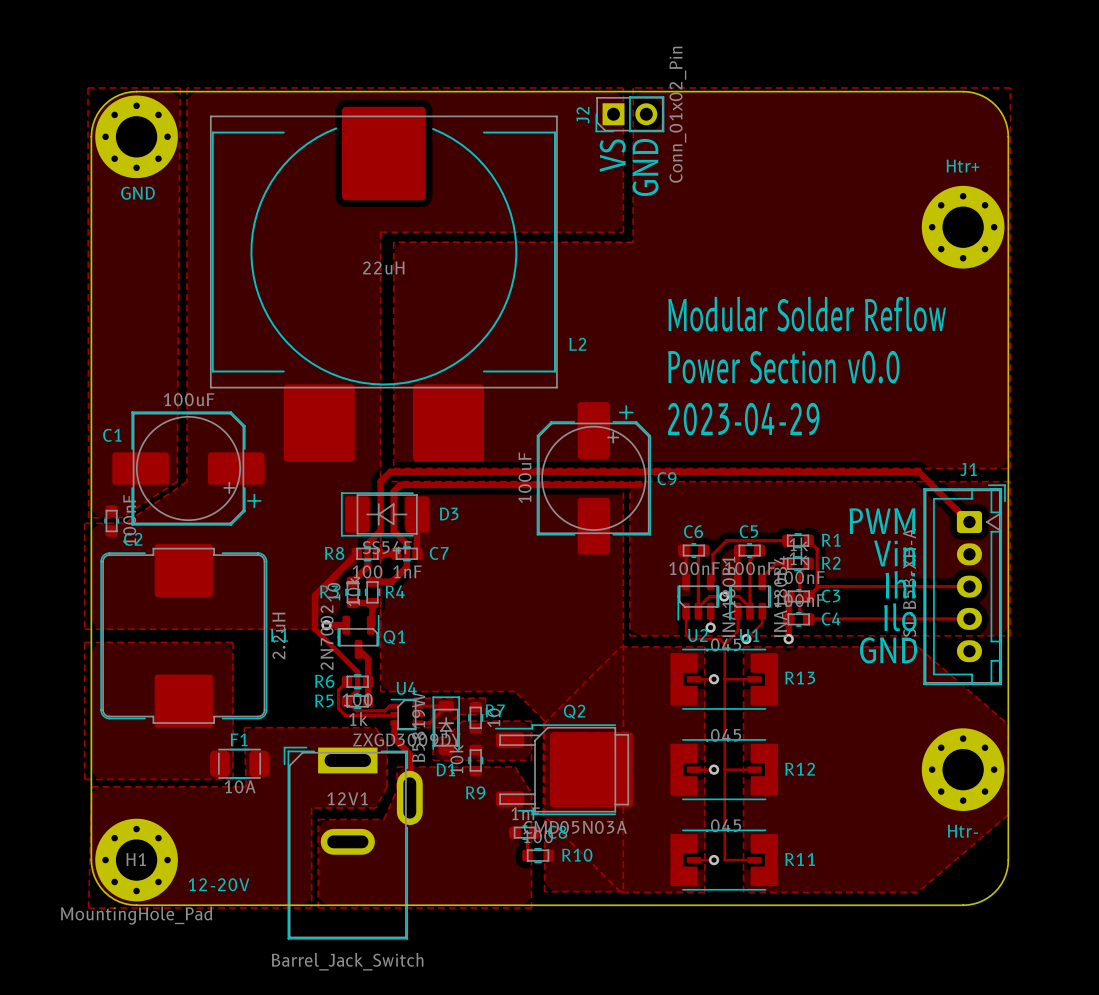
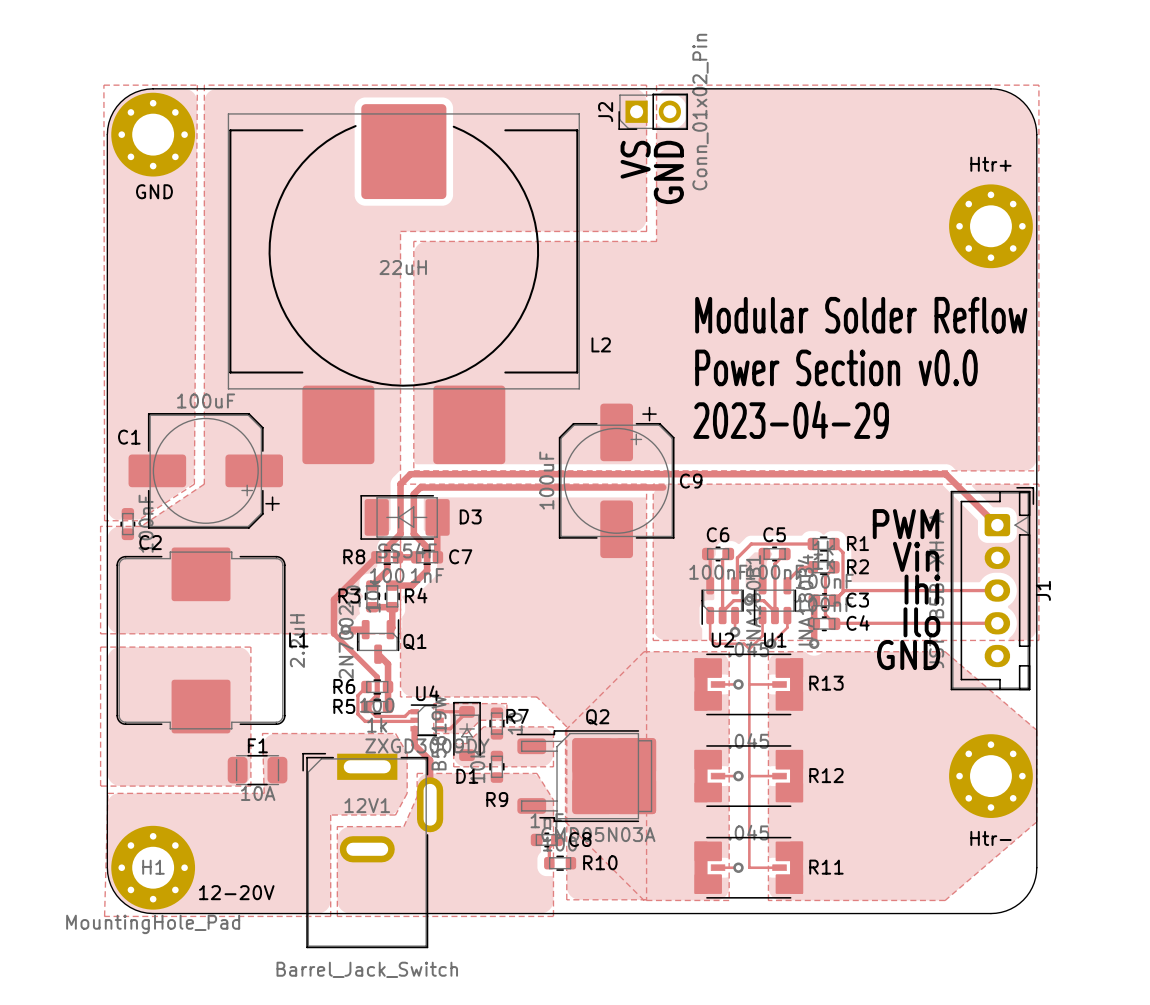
J1 name rotation: 0° (968, 469) -> 90° counterclockwise (1043, 590)
J1 name position: J1 (968, 469) -> J1 (1043, 590)

